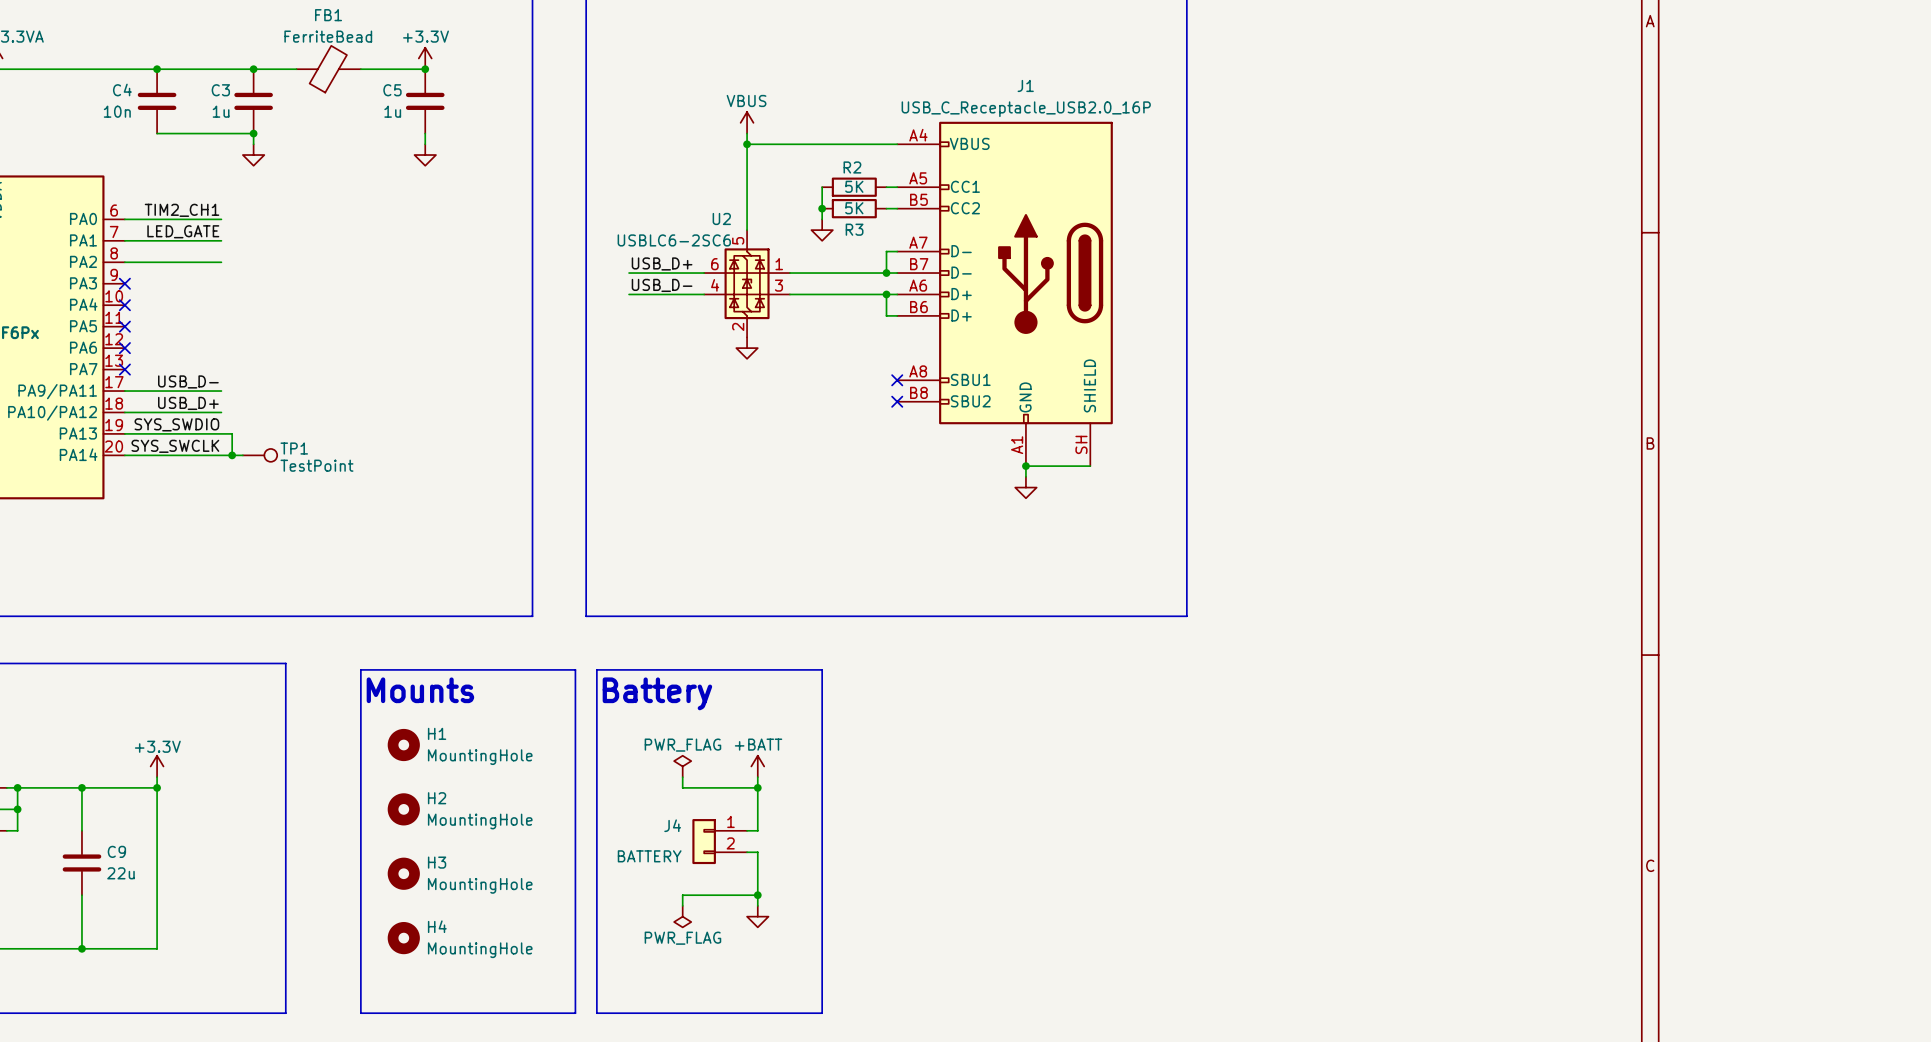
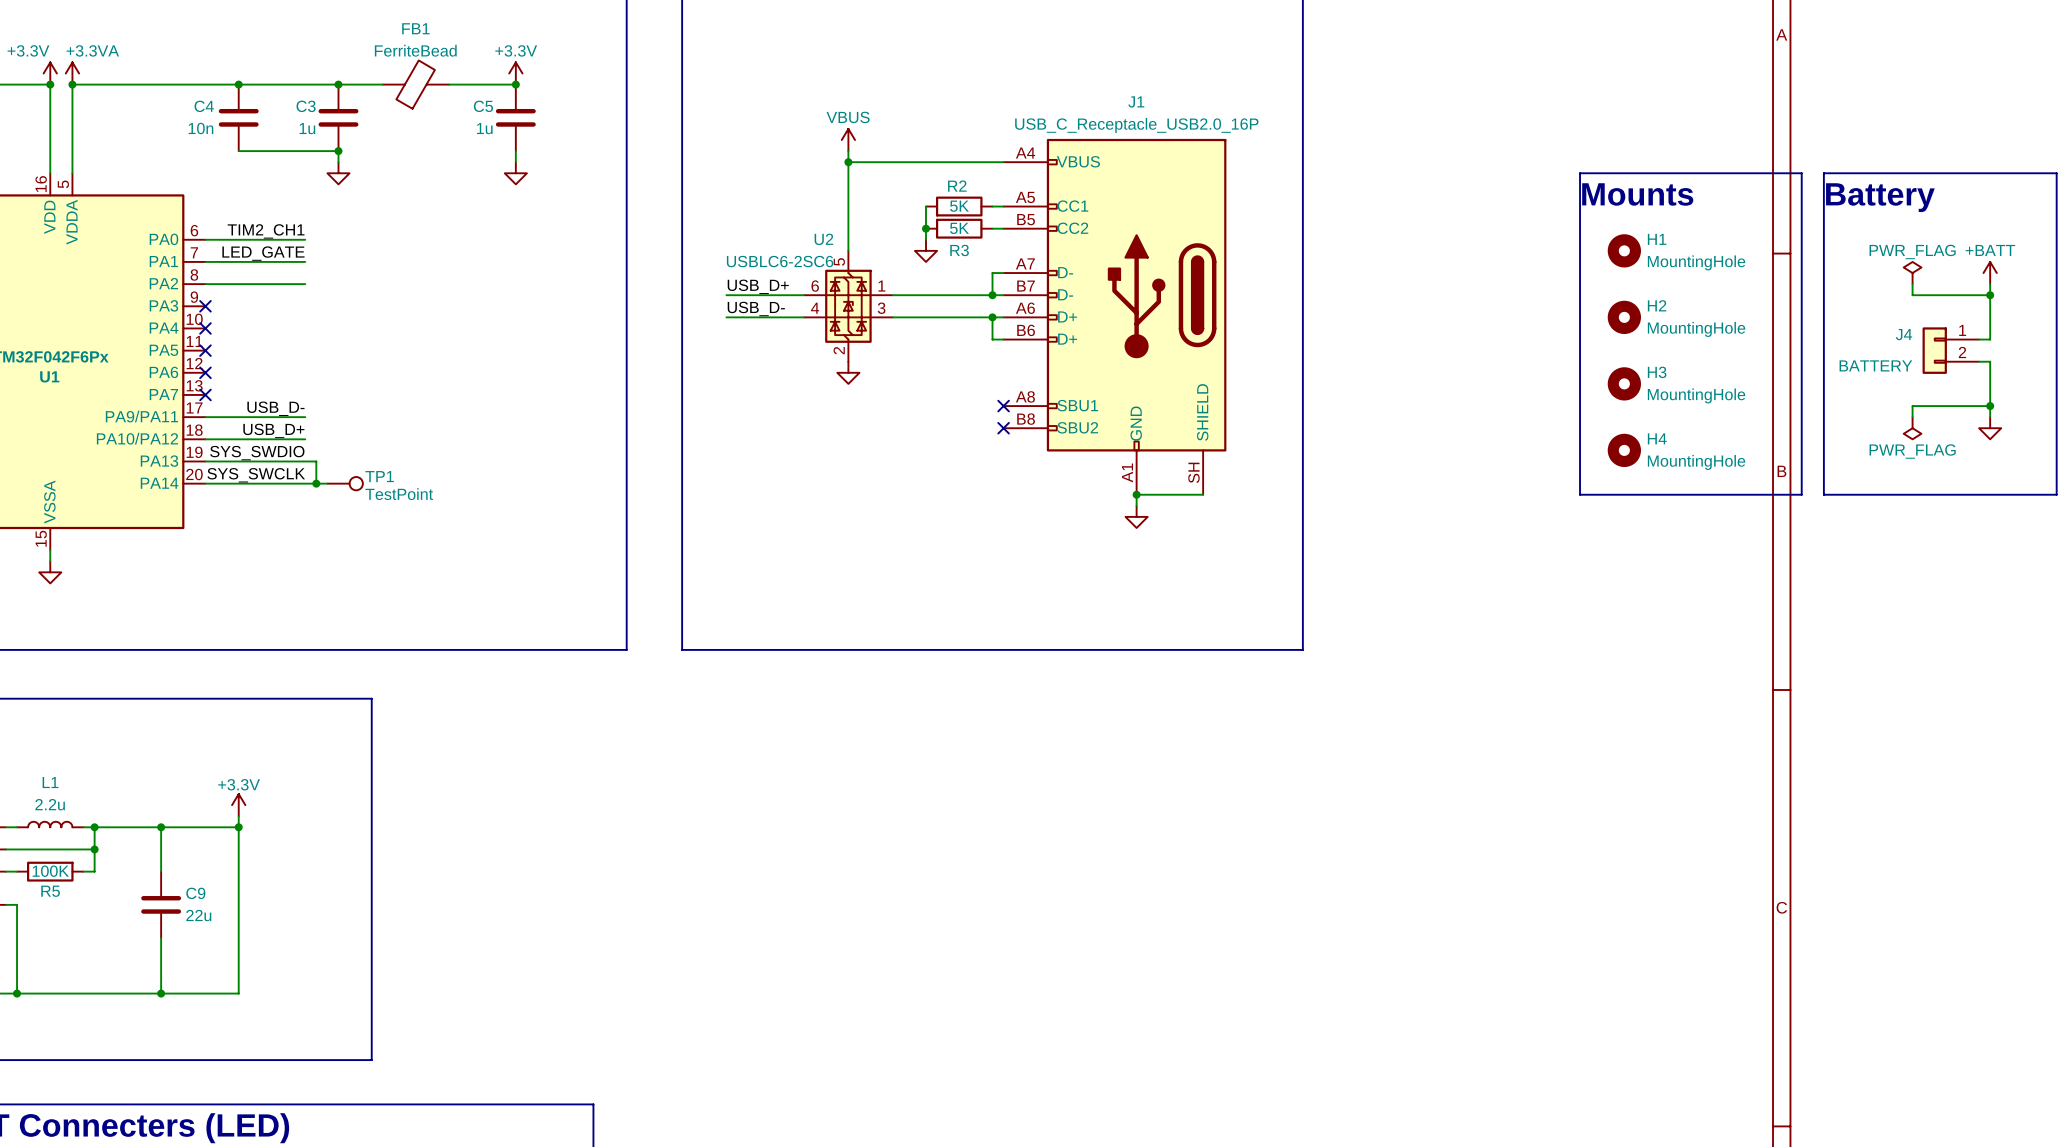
line: none -> (1580, 173) (1801, 173) (1801, 494) (1580, 494) (1580, 173)
line: none -> (1823, 173) (2056, 173) (2056, 494) (1823, 494) (1823, 173)
text: none -> Mounts (1637, 194)
text: none -> Battery (1880, 197)
power symbol: none -> PWR_FLAG (1912, 273)
power symbol: none -> +BATT (1990, 273)
wire: none -> (1912, 284) (1912, 295) (1990, 295)
wire: none -> (1990, 284) (1990, 339) (1979, 339)
junction: none -> (1990, 295)
wire: none -> (1979, 361) (1990, 361) (1990, 417)
wire: none -> (1990, 406) (1912, 406) (1912, 417)
junction: none -> (1990, 406)
power symbol: none -> PWR_FLAG (1912, 428)
power symbol: none -> (1990, 428)
line: (360, 669) (575, 669) (575, 1013) (360, 1013) (360, 669) -> none
line: (596, 669) (822, 669) (822, 1013) (596, 1013) (596, 669) -> none
text: Mounts (420, 690) -> none
text: Battery (657, 693) -> none
H1 position: (403, 745) -> (1624, 250)
power symbol: PWR_FLAG (682, 766) -> none
power symbol: +BATT (757, 766) -> none
wire: (682, 777) (682, 787) (757, 787) -> none
wire: (757, 777) (757, 830) (747, 830) -> none
junction: (757, 787) -> none
H2 position: (403, 809) -> (1624, 317)
J4 position: (719, 841) -> (1950, 350)
wire: (747, 852) (757, 852) (757, 905) -> none
H3 position: (403, 873) -> (1624, 383)
wire: (757, 895) (682, 895) (682, 905) -> none
junction: (757, 895) -> none
power symbol: PWR_FLAG (682, 916) -> none
power symbol: (757, 916) -> none
H4 position: (403, 938) -> (1624, 450)

